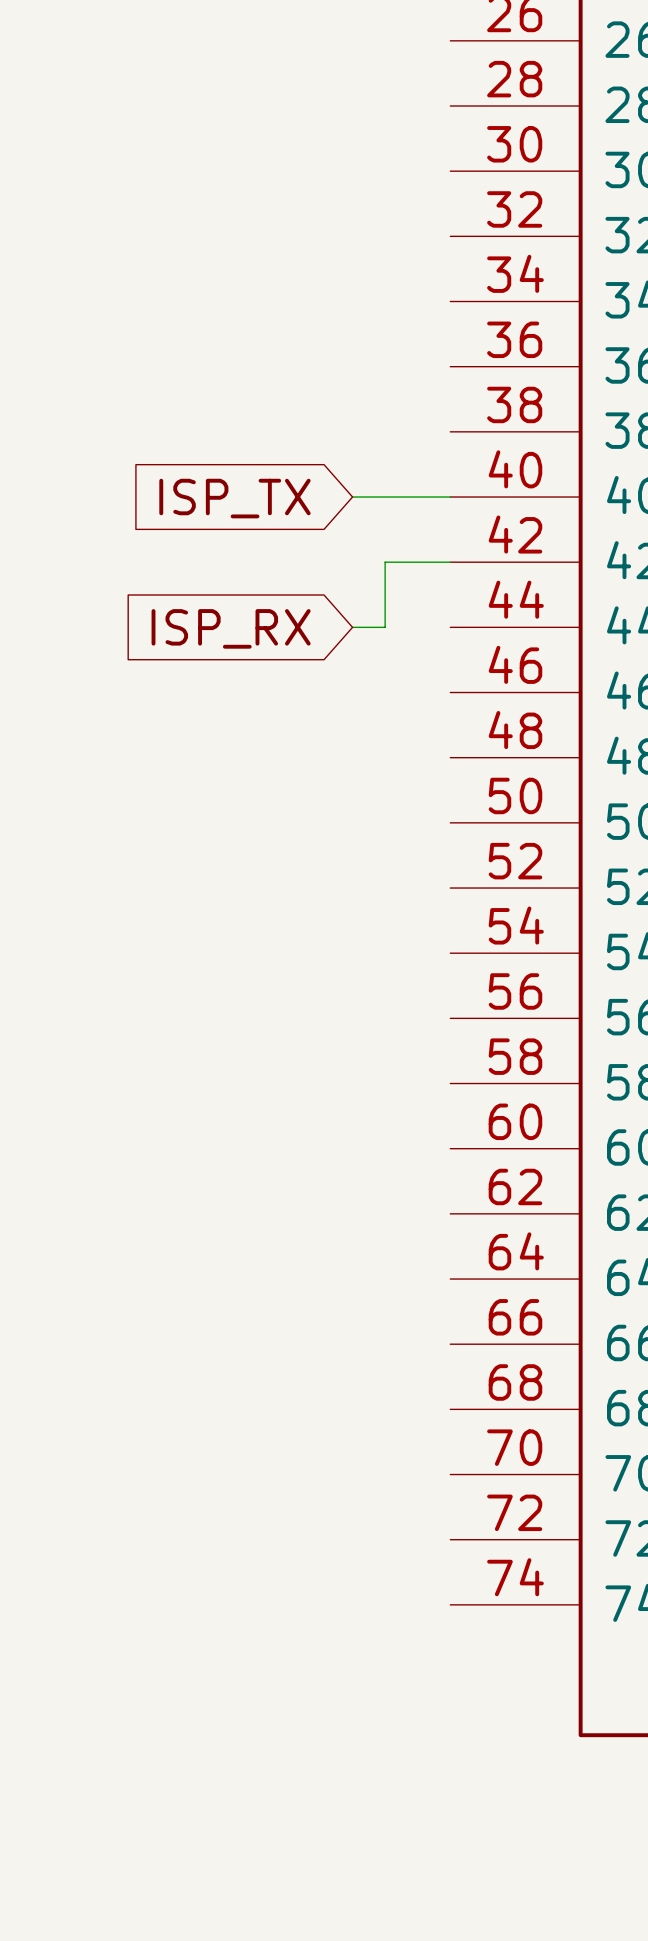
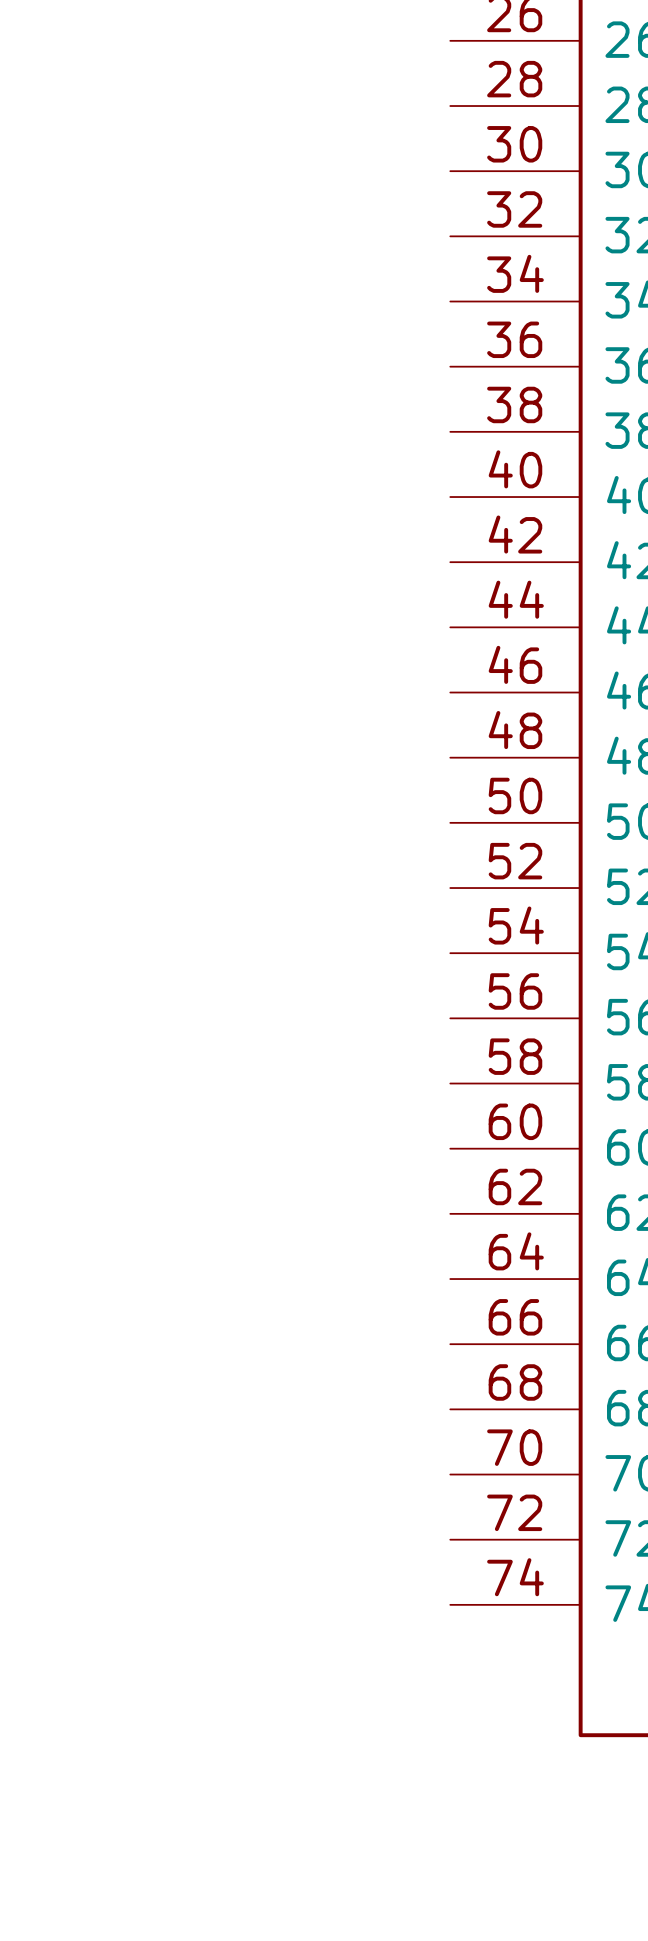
wire: (352, 497) (450, 497) -> none
global label: ISP_TX (234, 498) -> none
wire: (450, 562) (385, 562) (385, 627) (352, 627) -> none
global label: ISP_RX (231, 628) -> none

